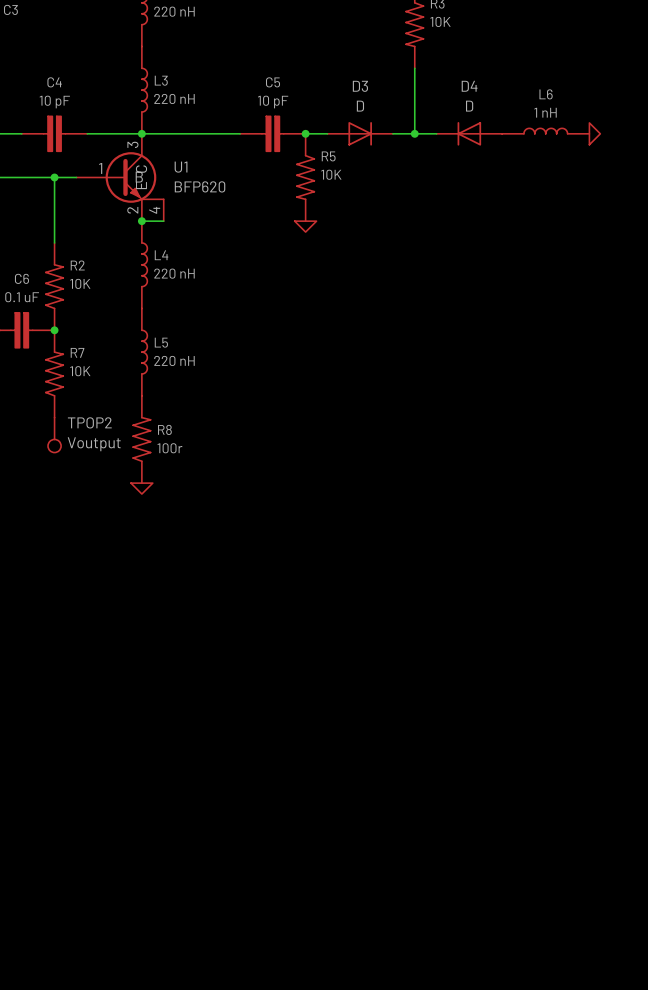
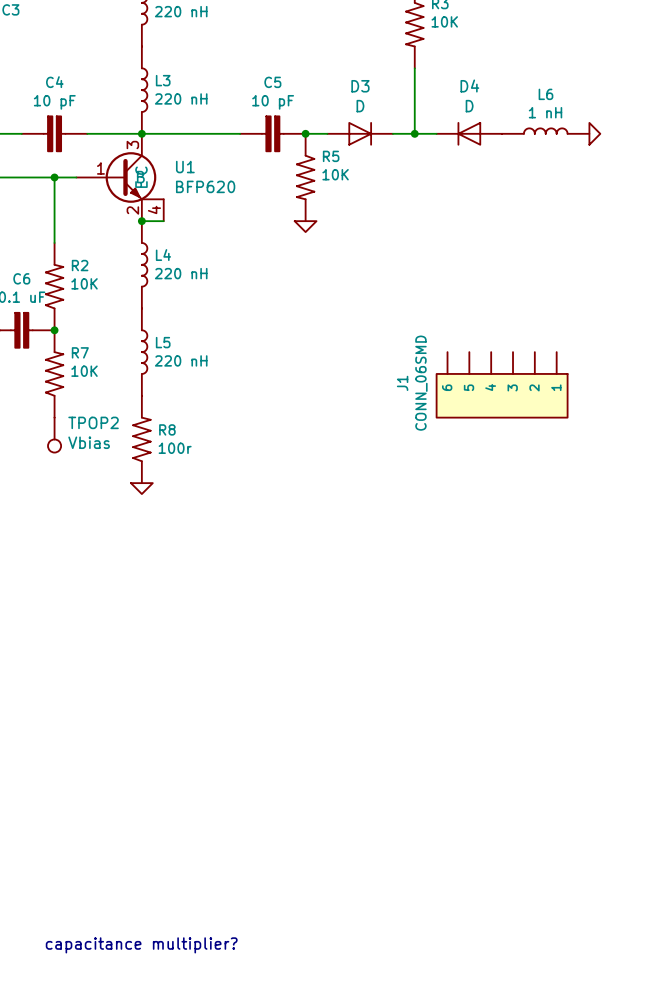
J1: none -> CONN_06SMD (502, 384)
TPOP2 value: Voutput (94, 444) -> Vbias (89, 442)
text: none -> capacitance multiplier? (141, 945)

